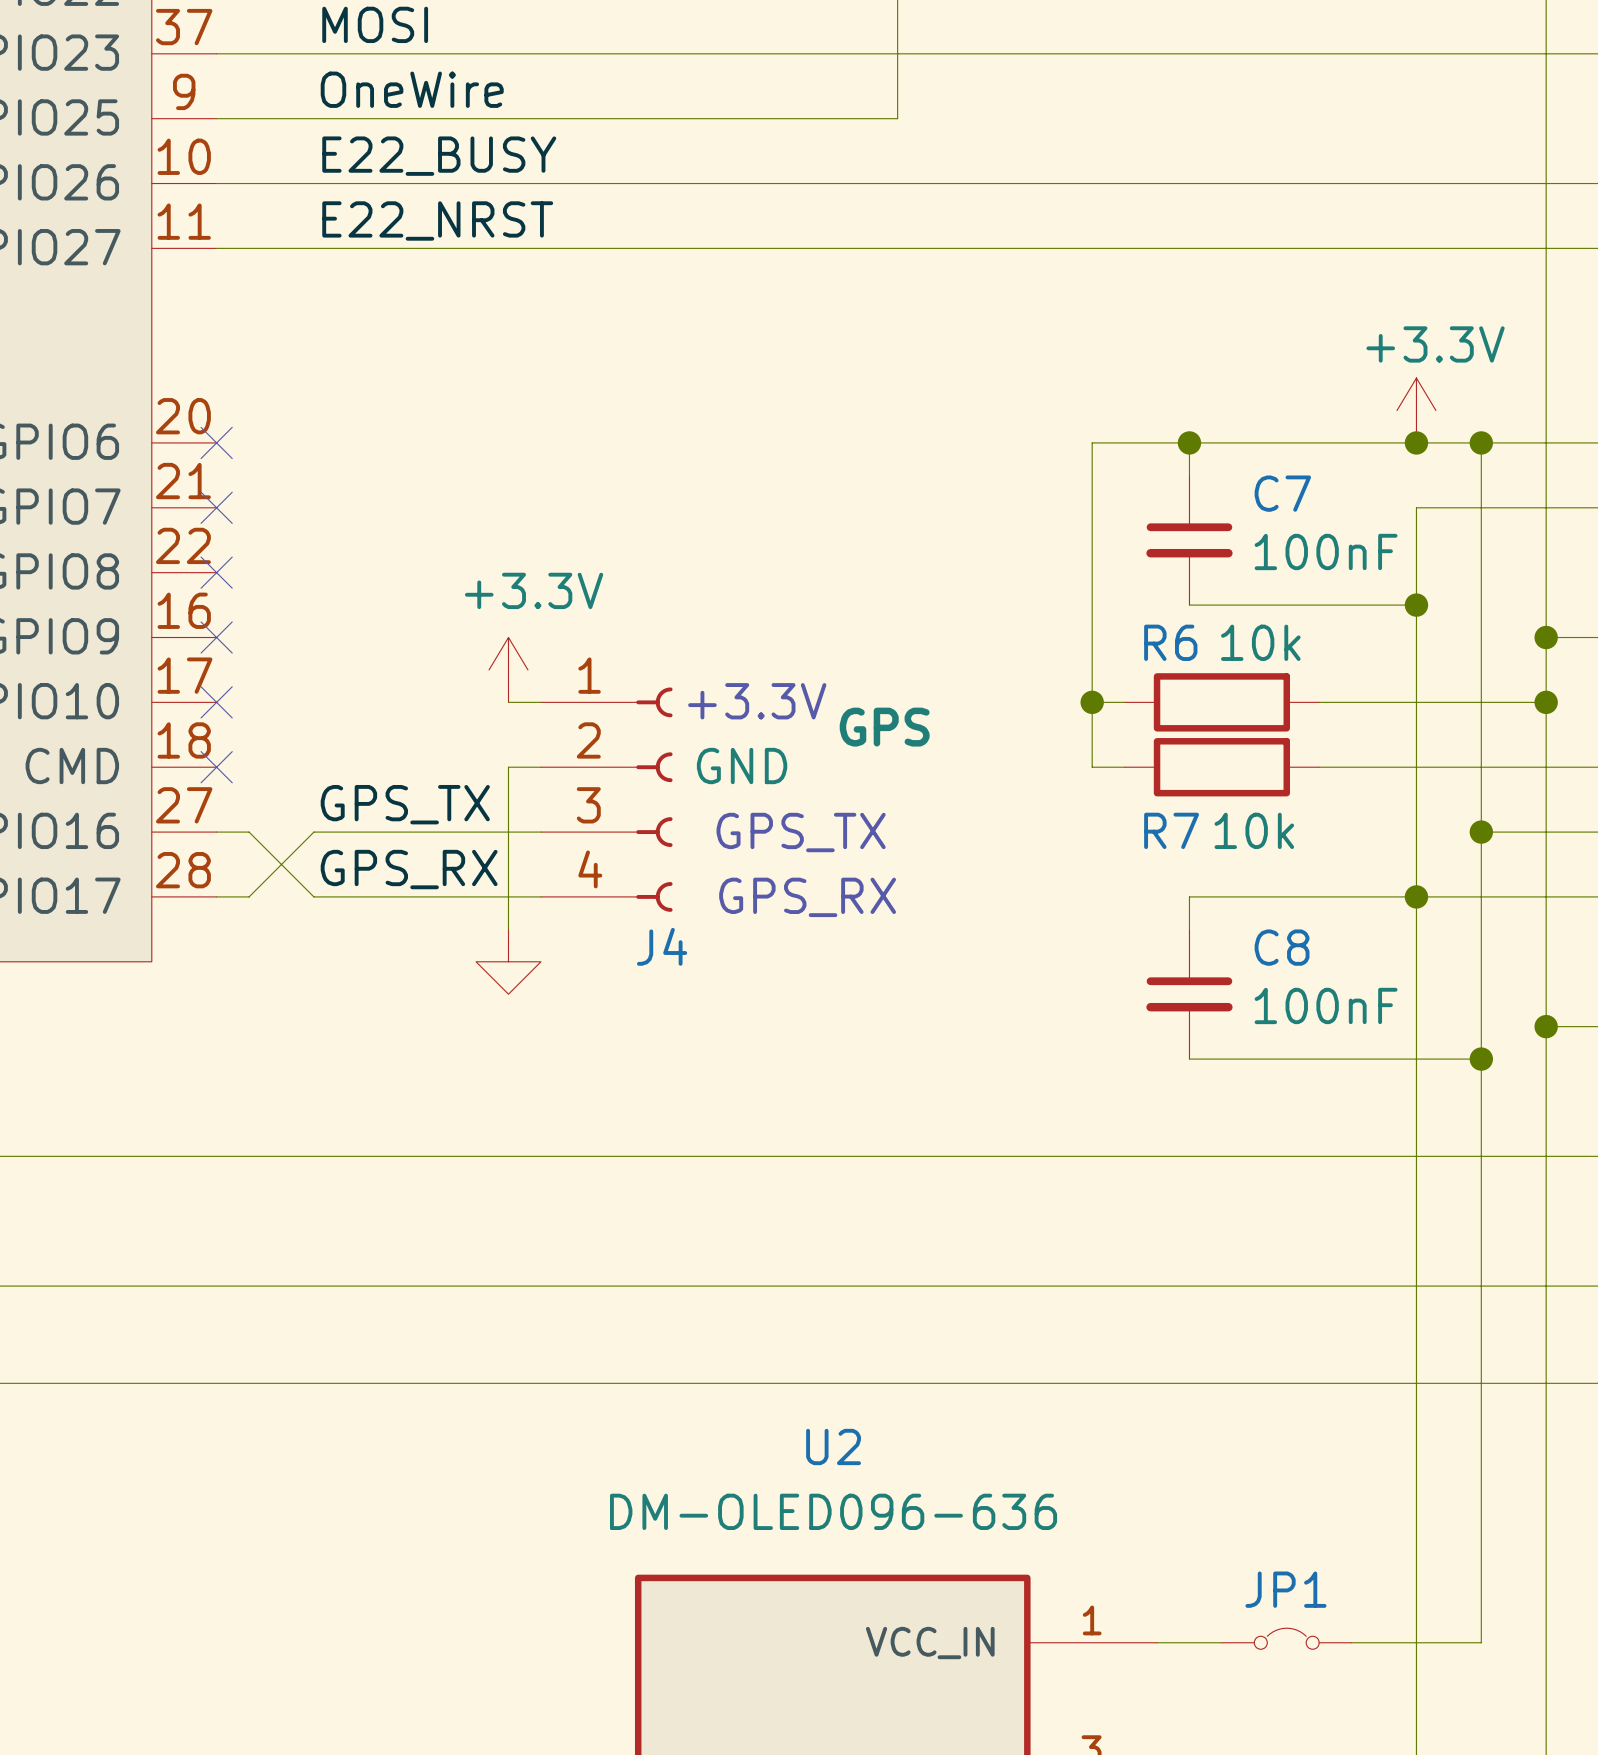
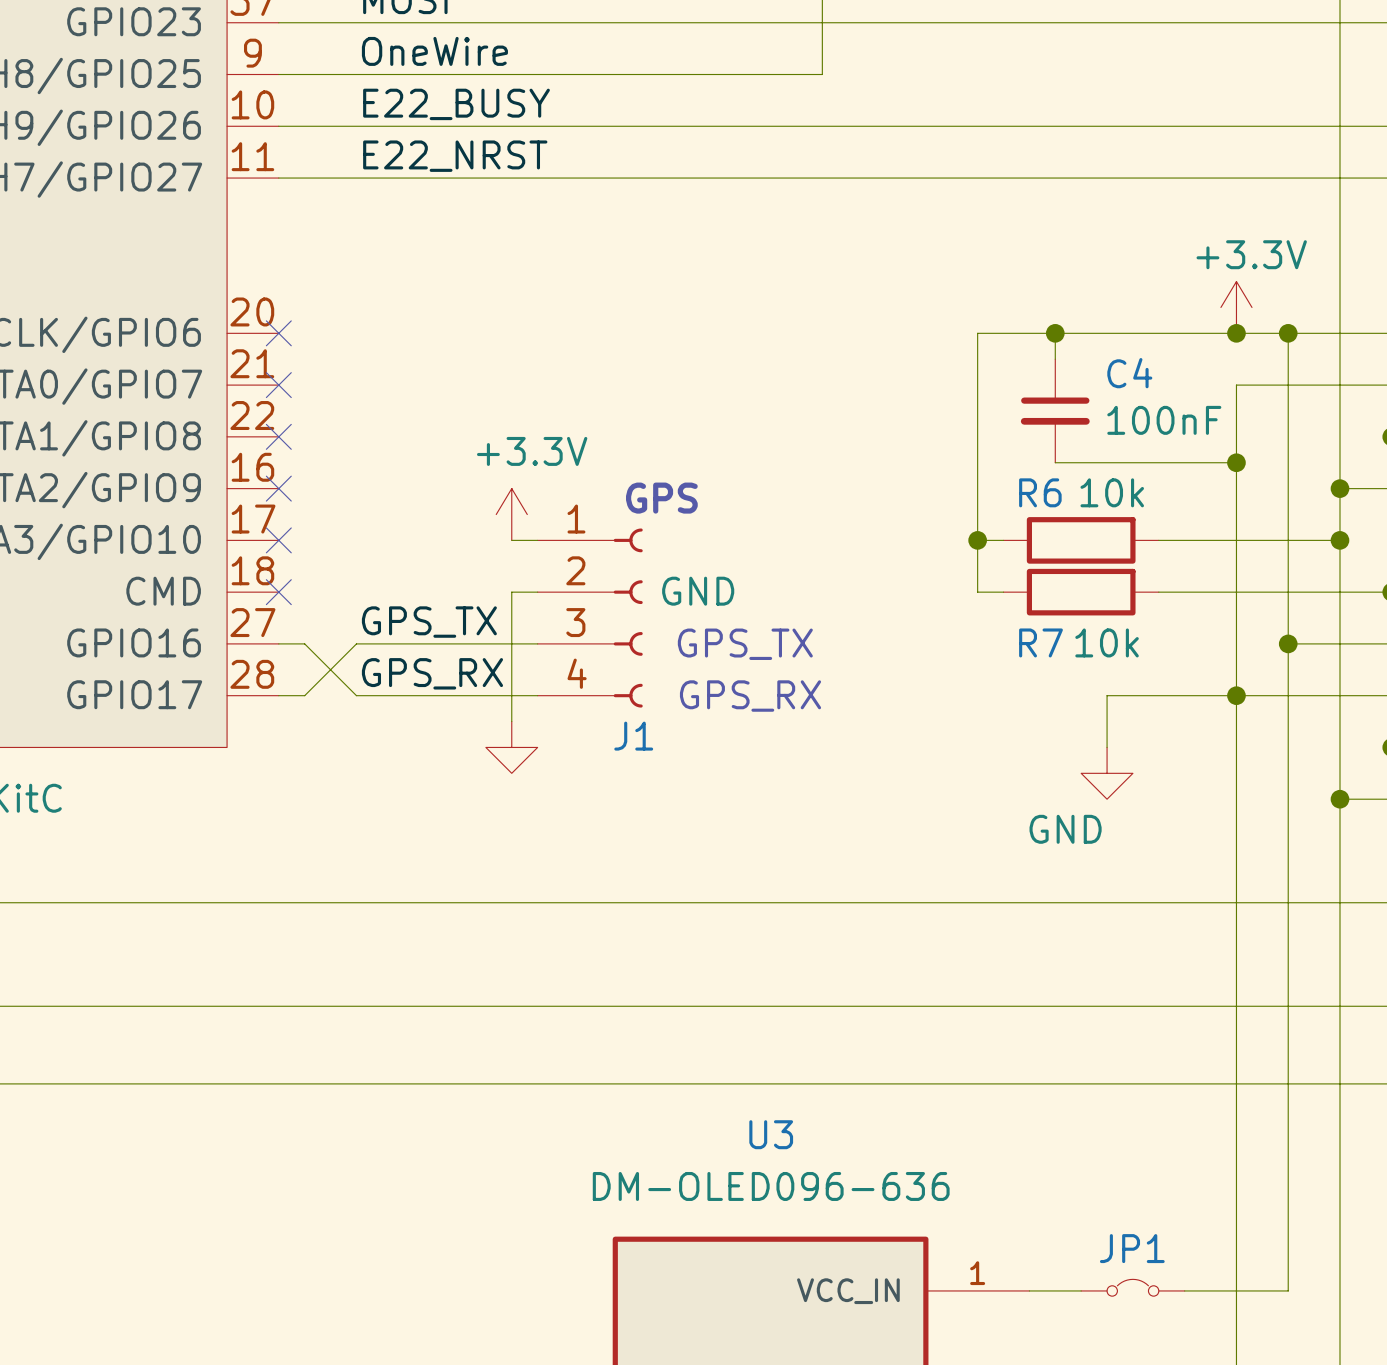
C7 name: C7 (1282, 493) -> C4 (1129, 373)
text: none -> GPS (661, 498)
text: +3.3V (757, 701) -> none
J4 text: GPS (884, 727) -> none
wire: (1254, 896) (1189, 896) (1189, 929) -> (1107, 695) (1107, 747)
J4 name: J4 (662, 946) -> J1 (633, 736)
C8: 100nF (1189, 994) -> none
power symbol: none -> GND (1107, 773)
wire: (1189, 1059) (1481, 1059) -> none
junction: (1481, 1059) -> none
U2 name: U2 (833, 1446) -> U3 (771, 1134)

